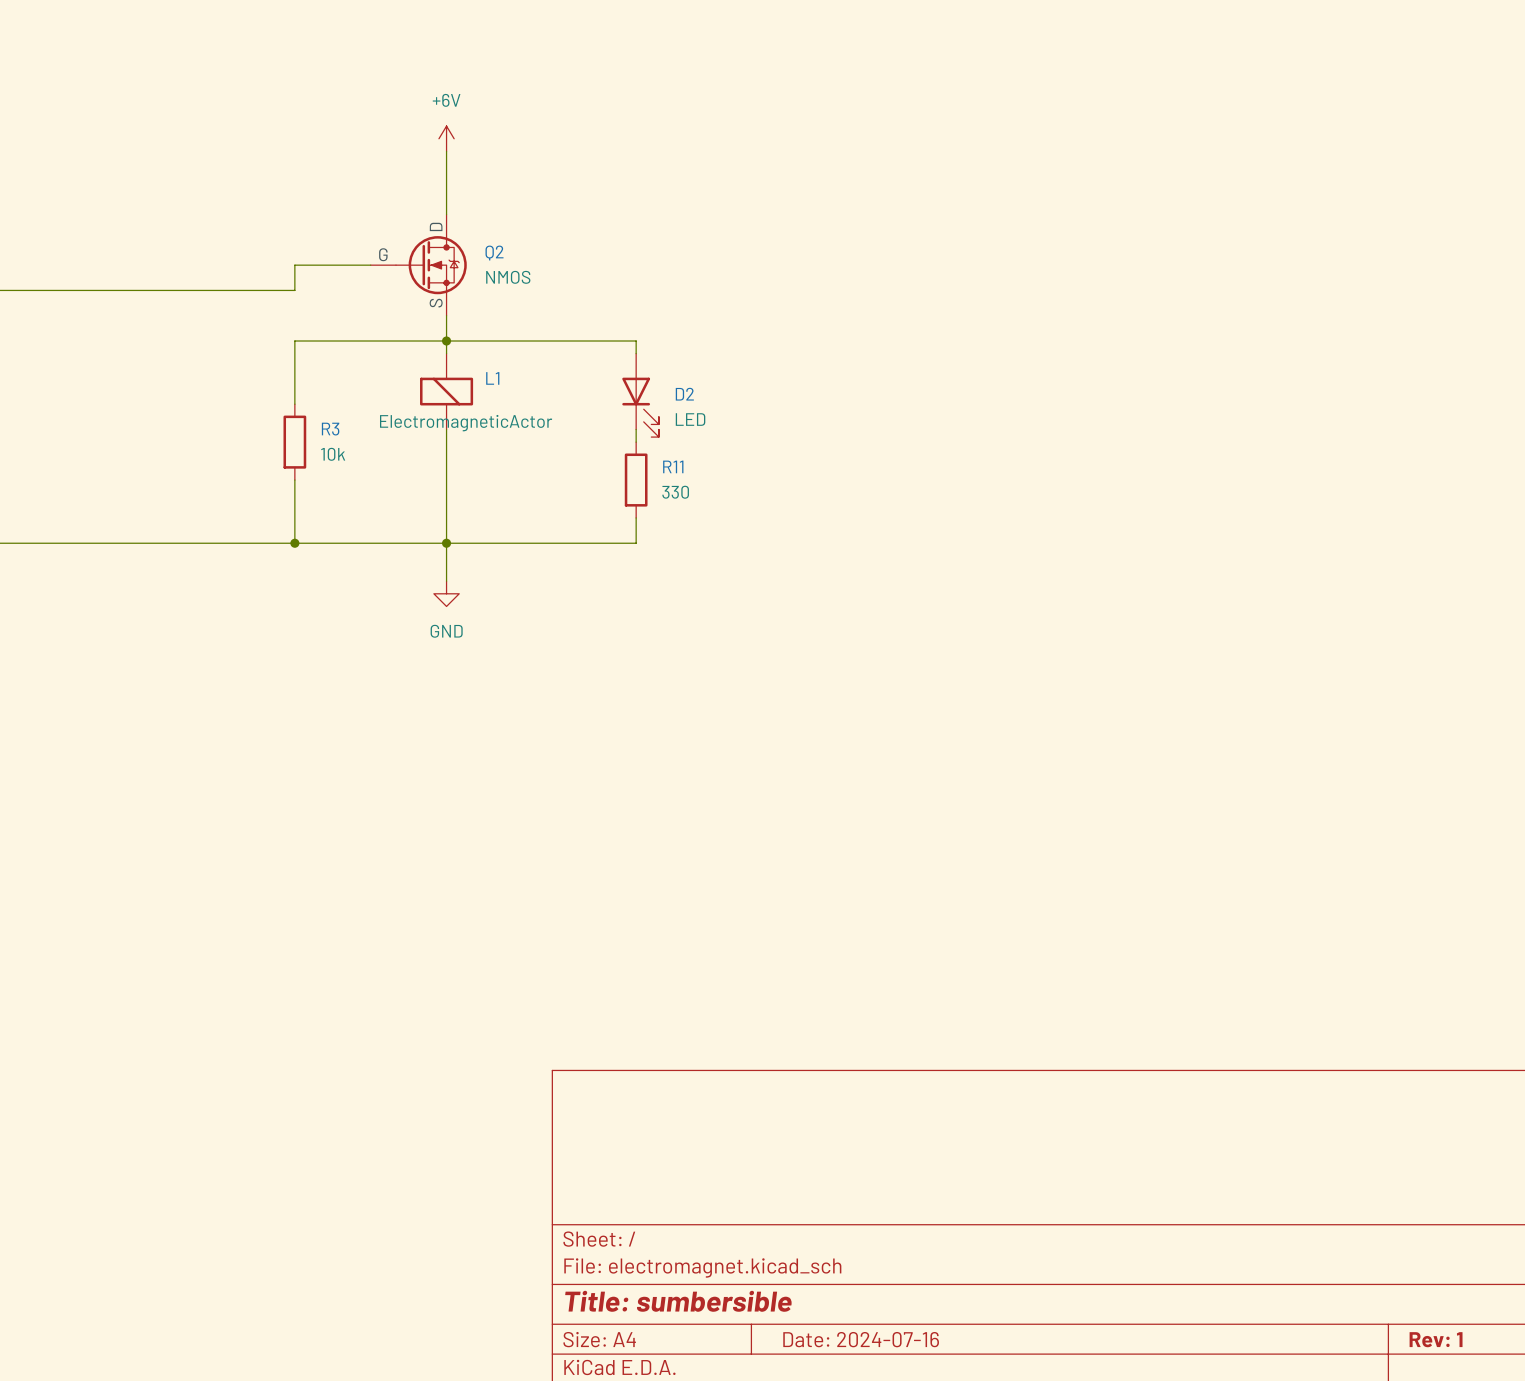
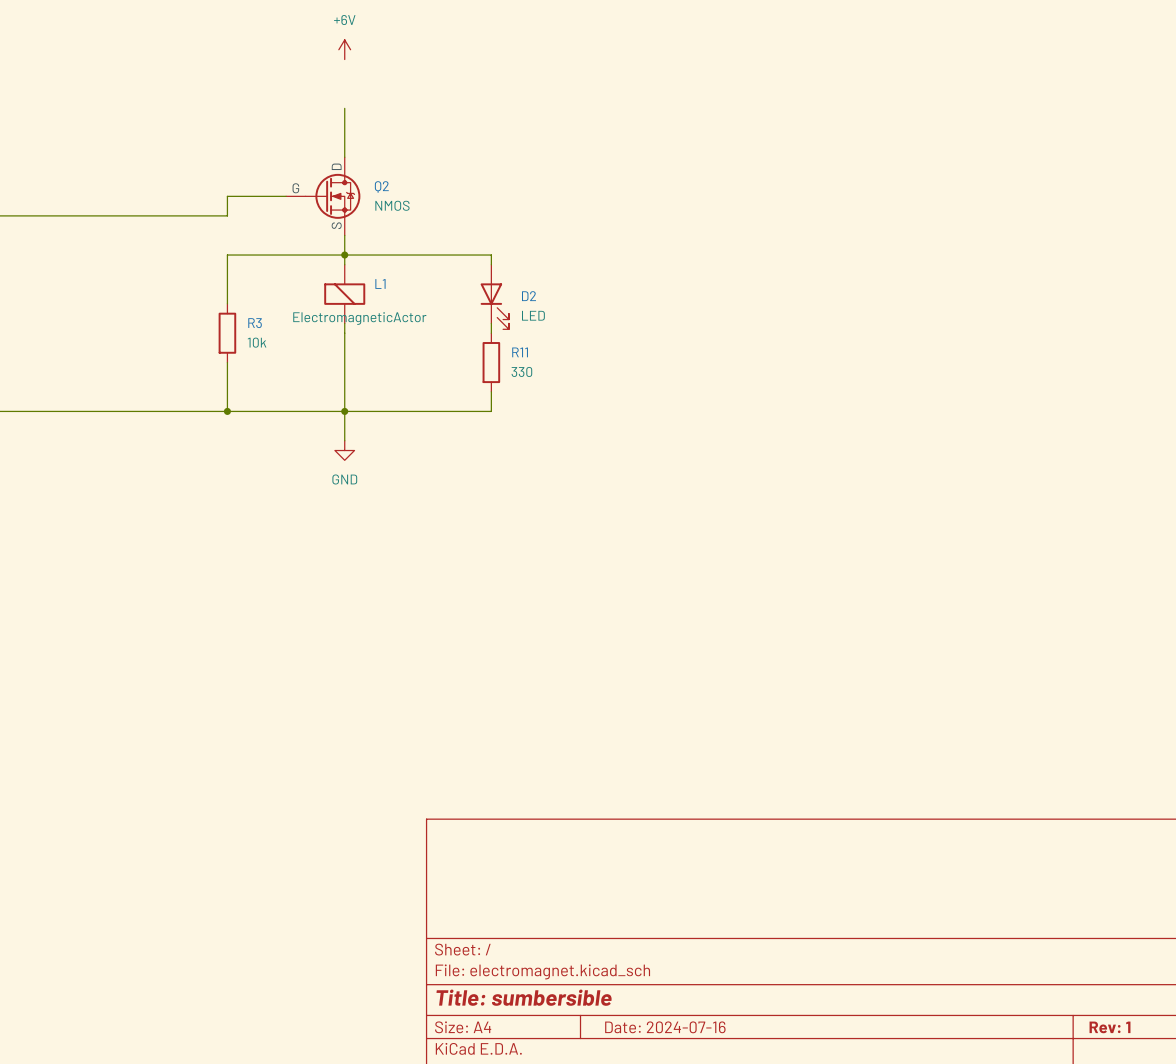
power symbol position: +6V (446, 138) -> +6V (344, 49)

